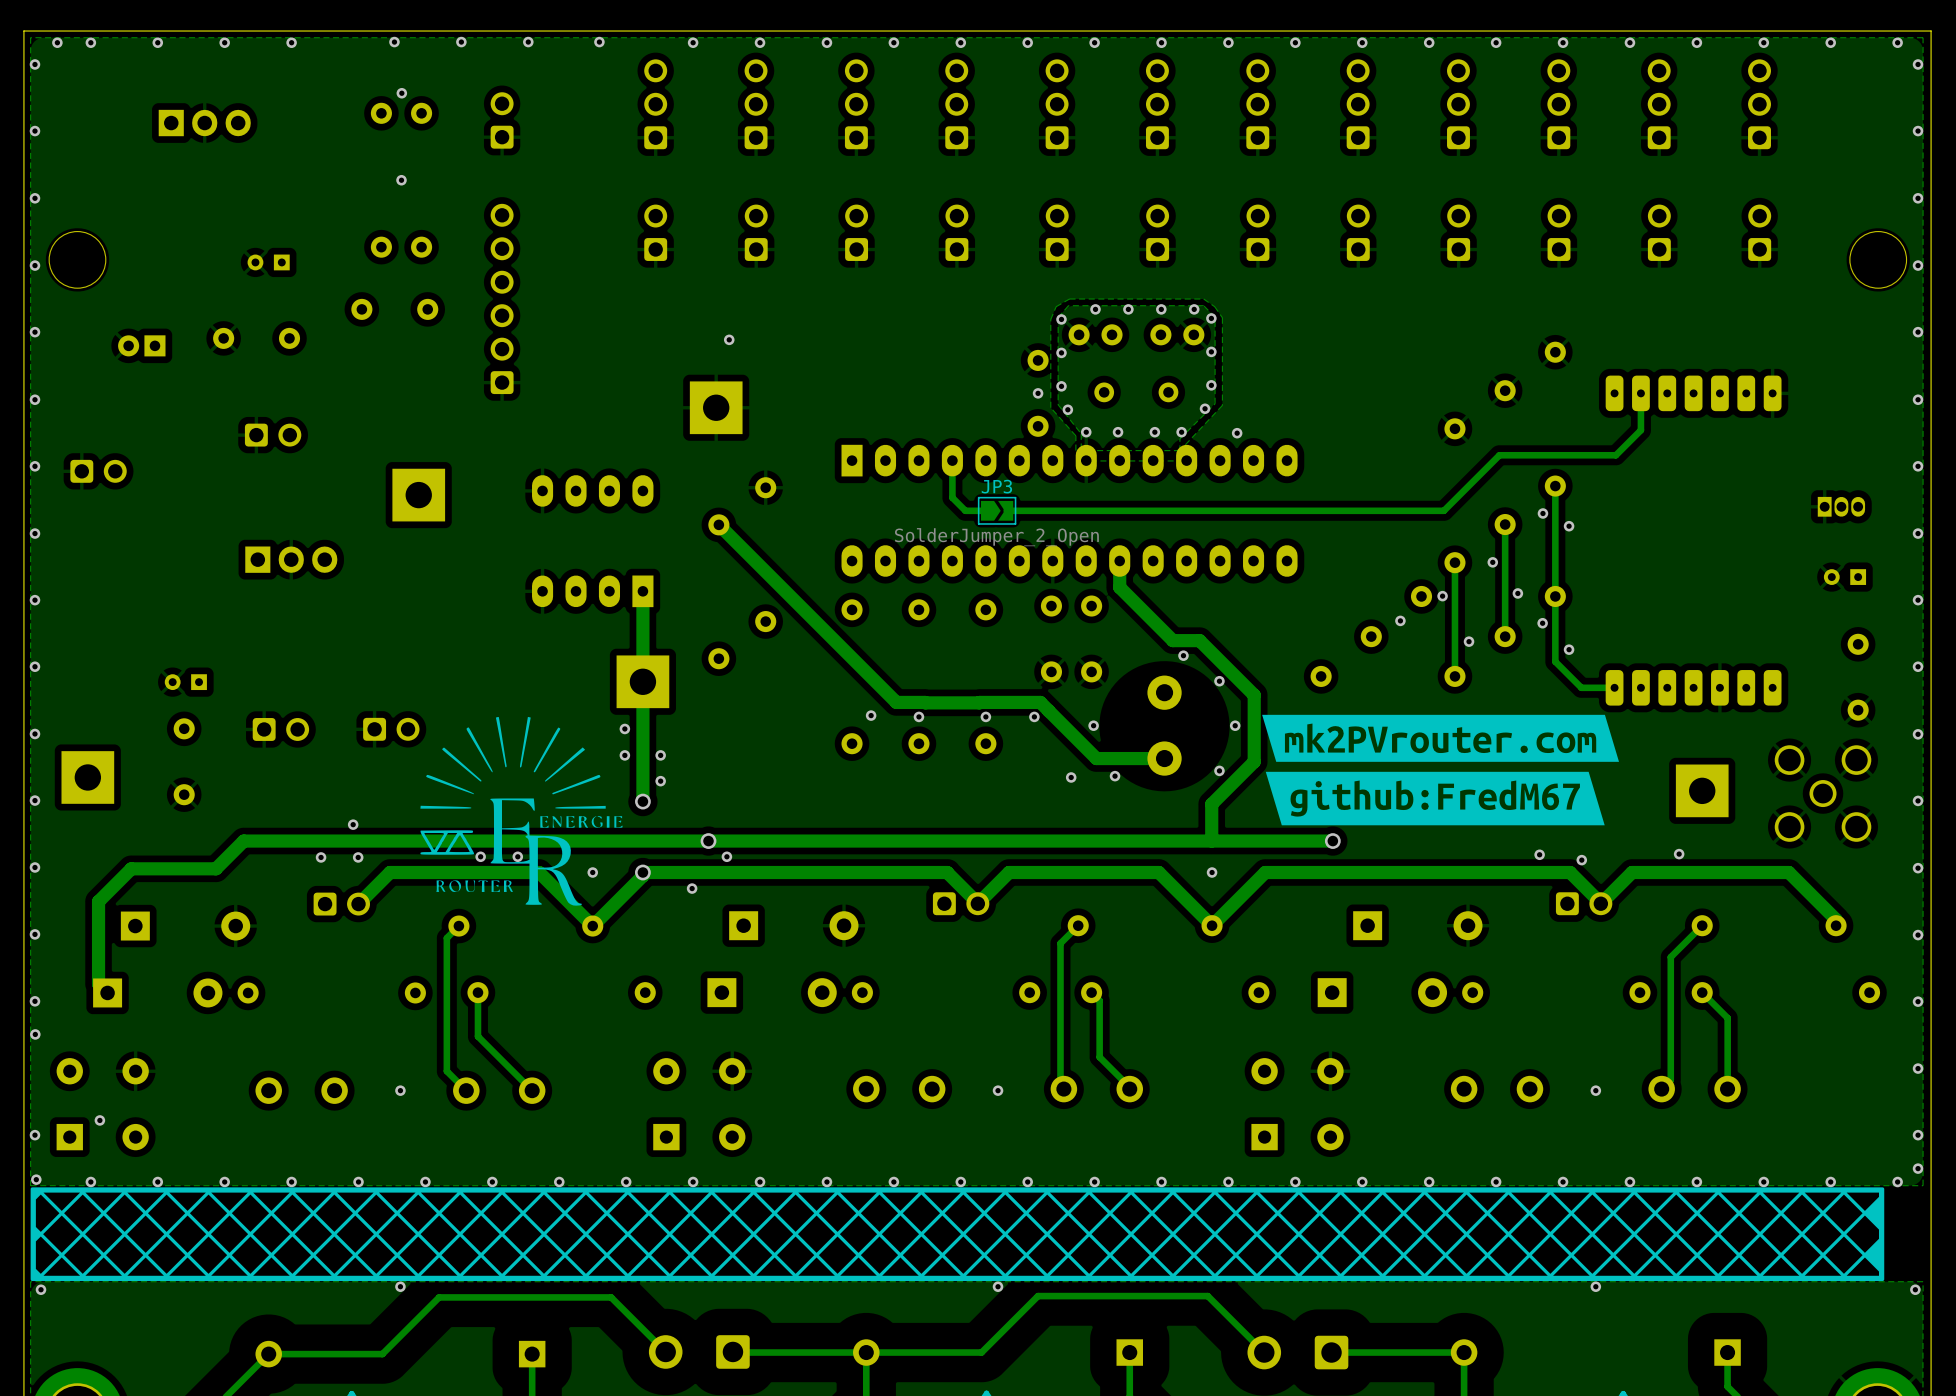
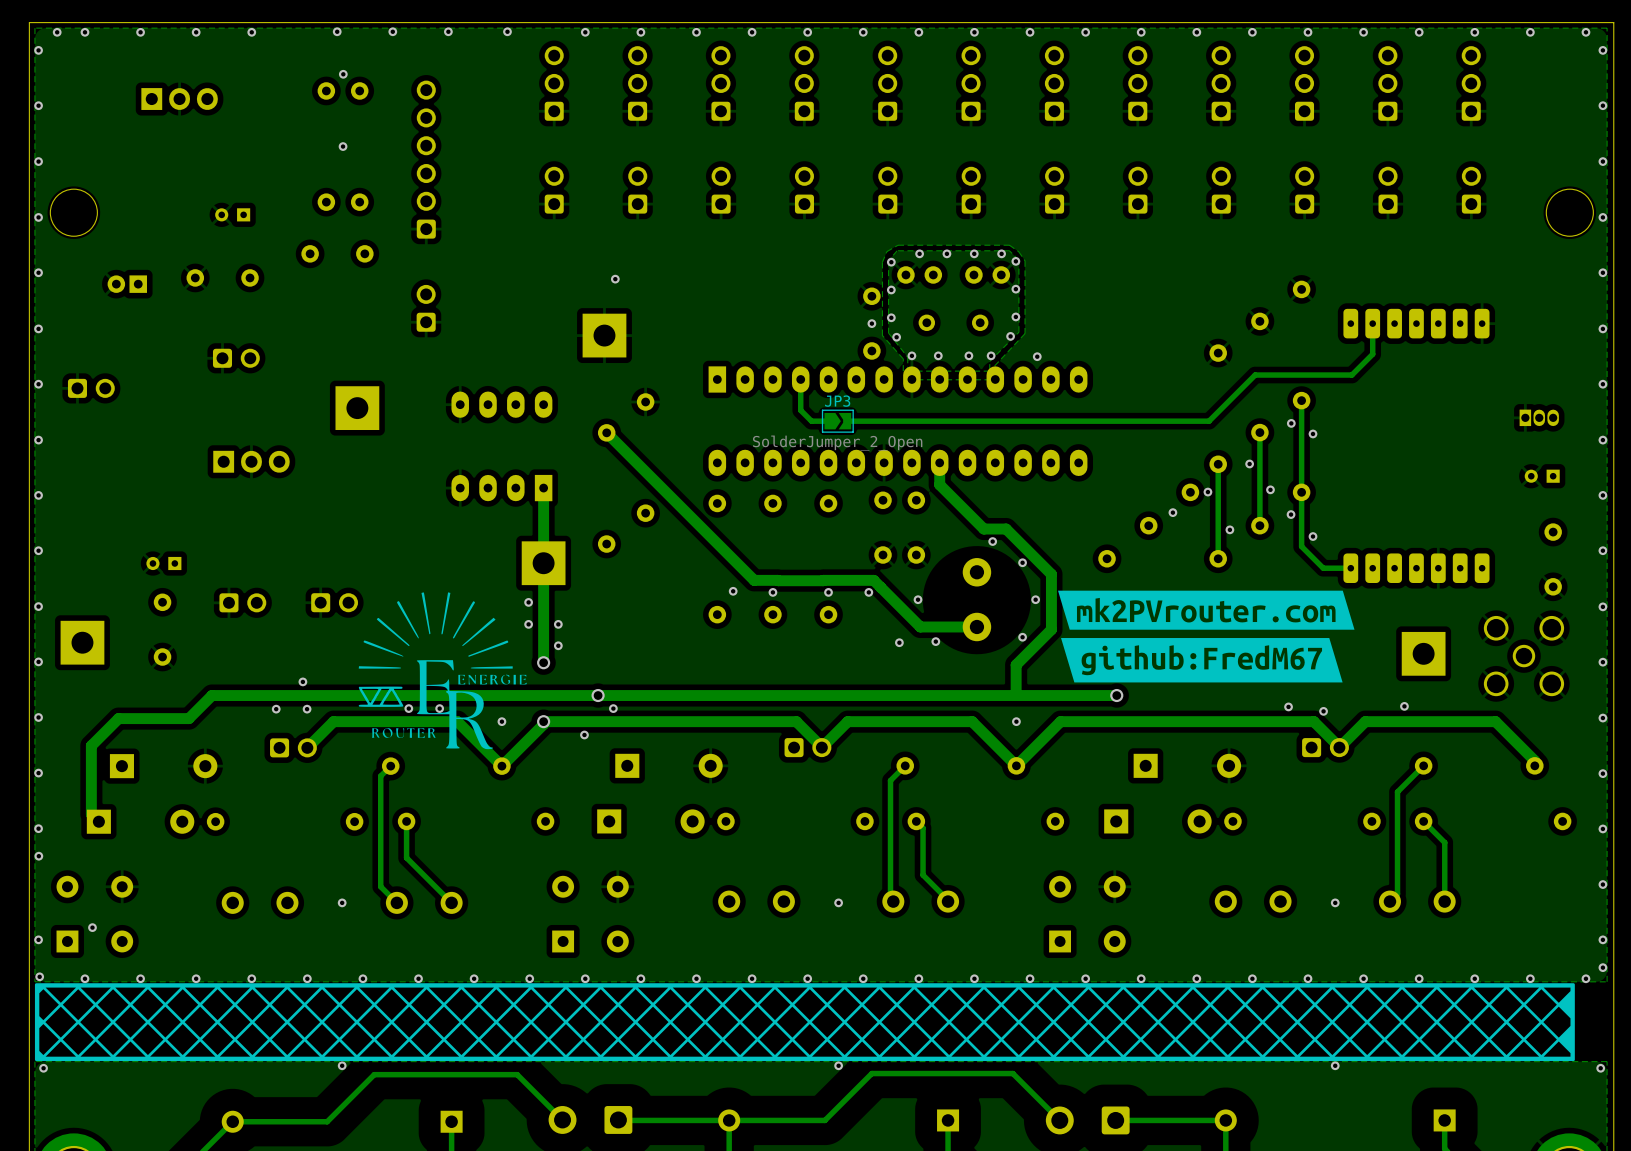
part position: (502, 120) -> (426, 308)
part position: (502, 298) -> (426, 159)

